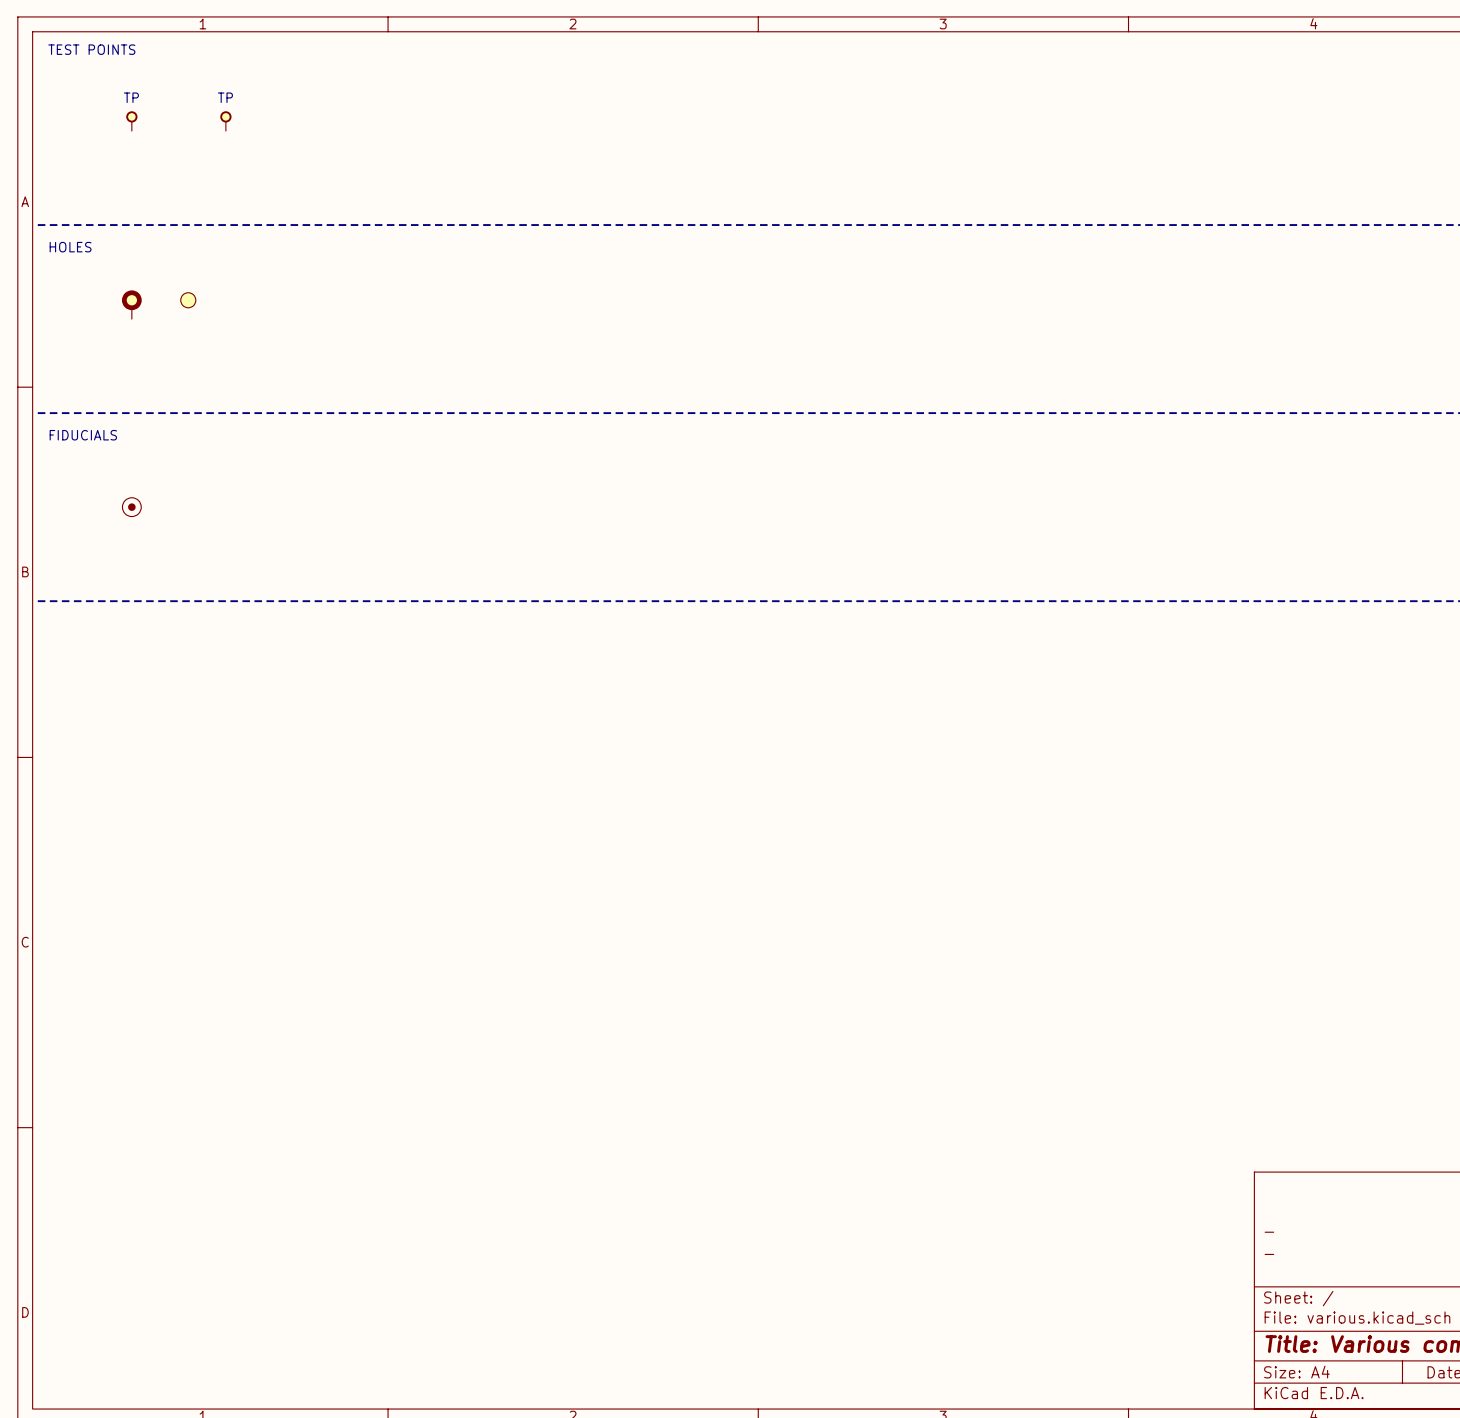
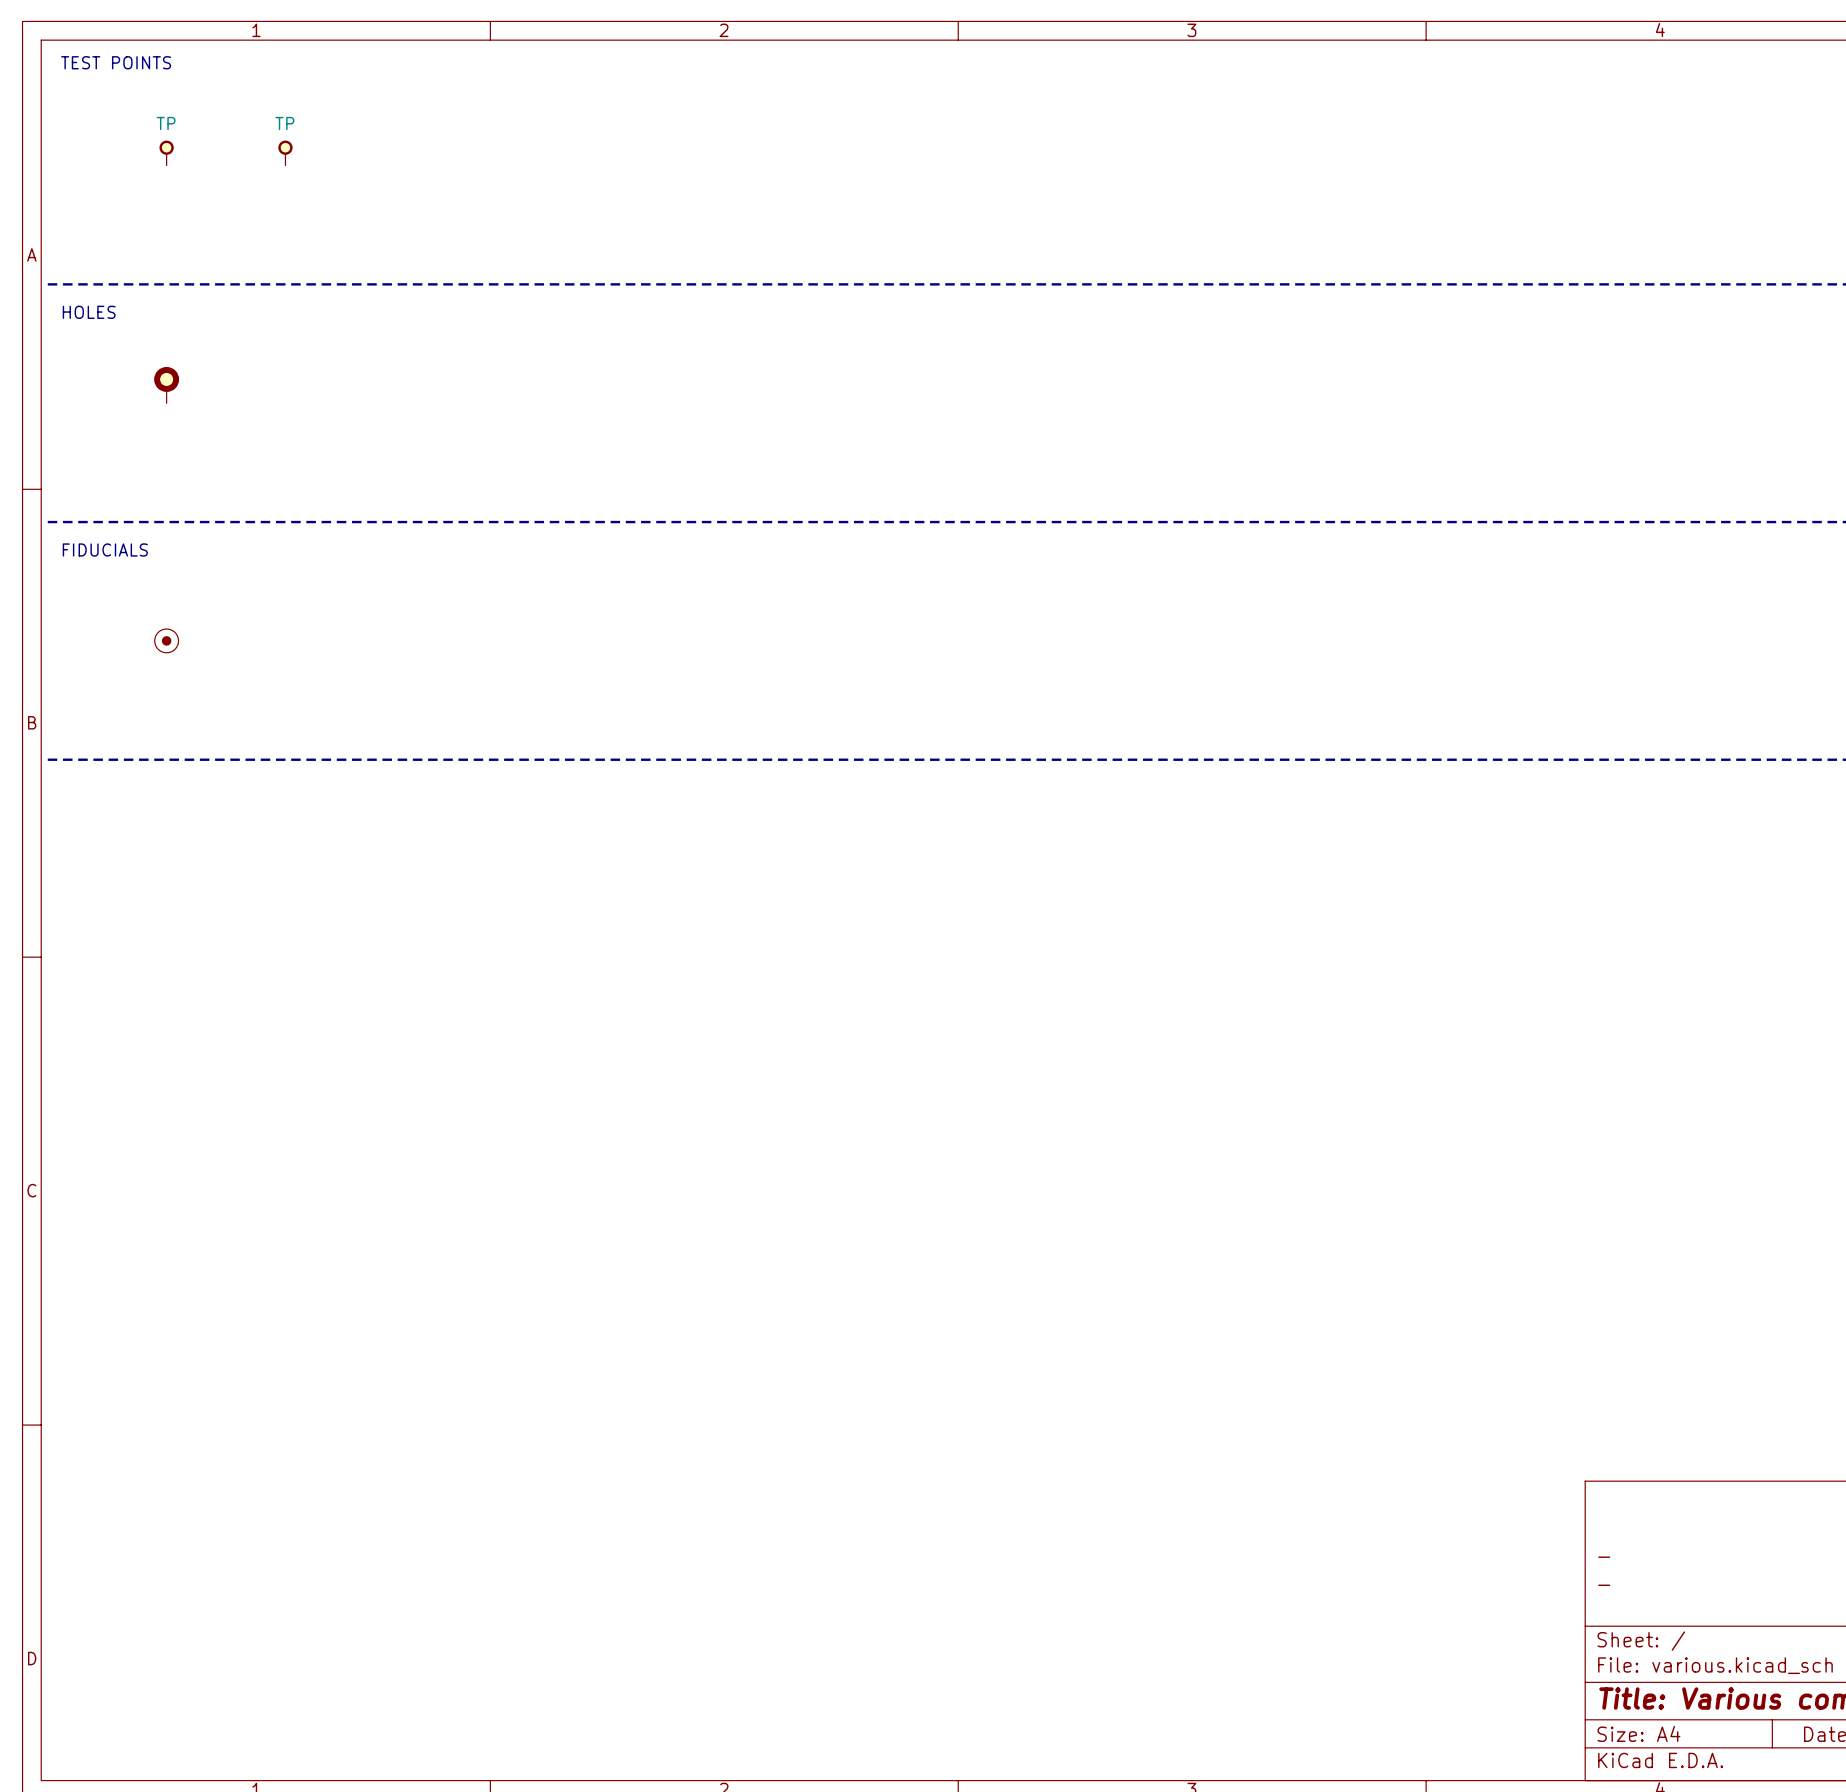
part: (188, 300) -> none

